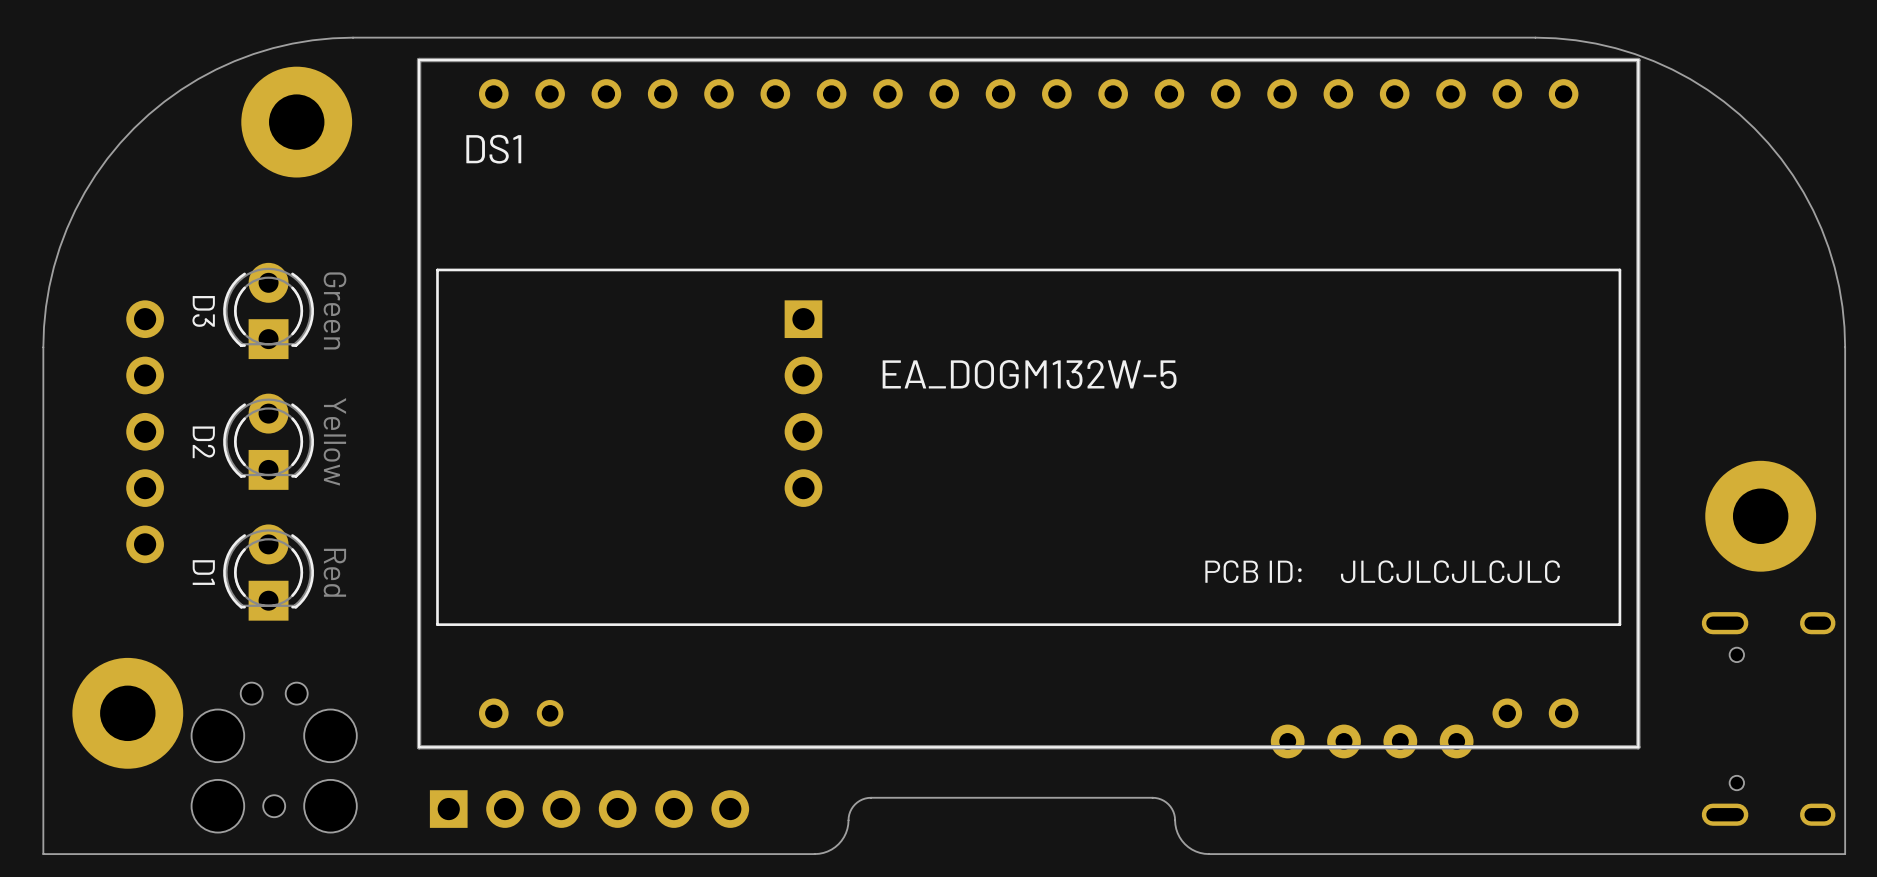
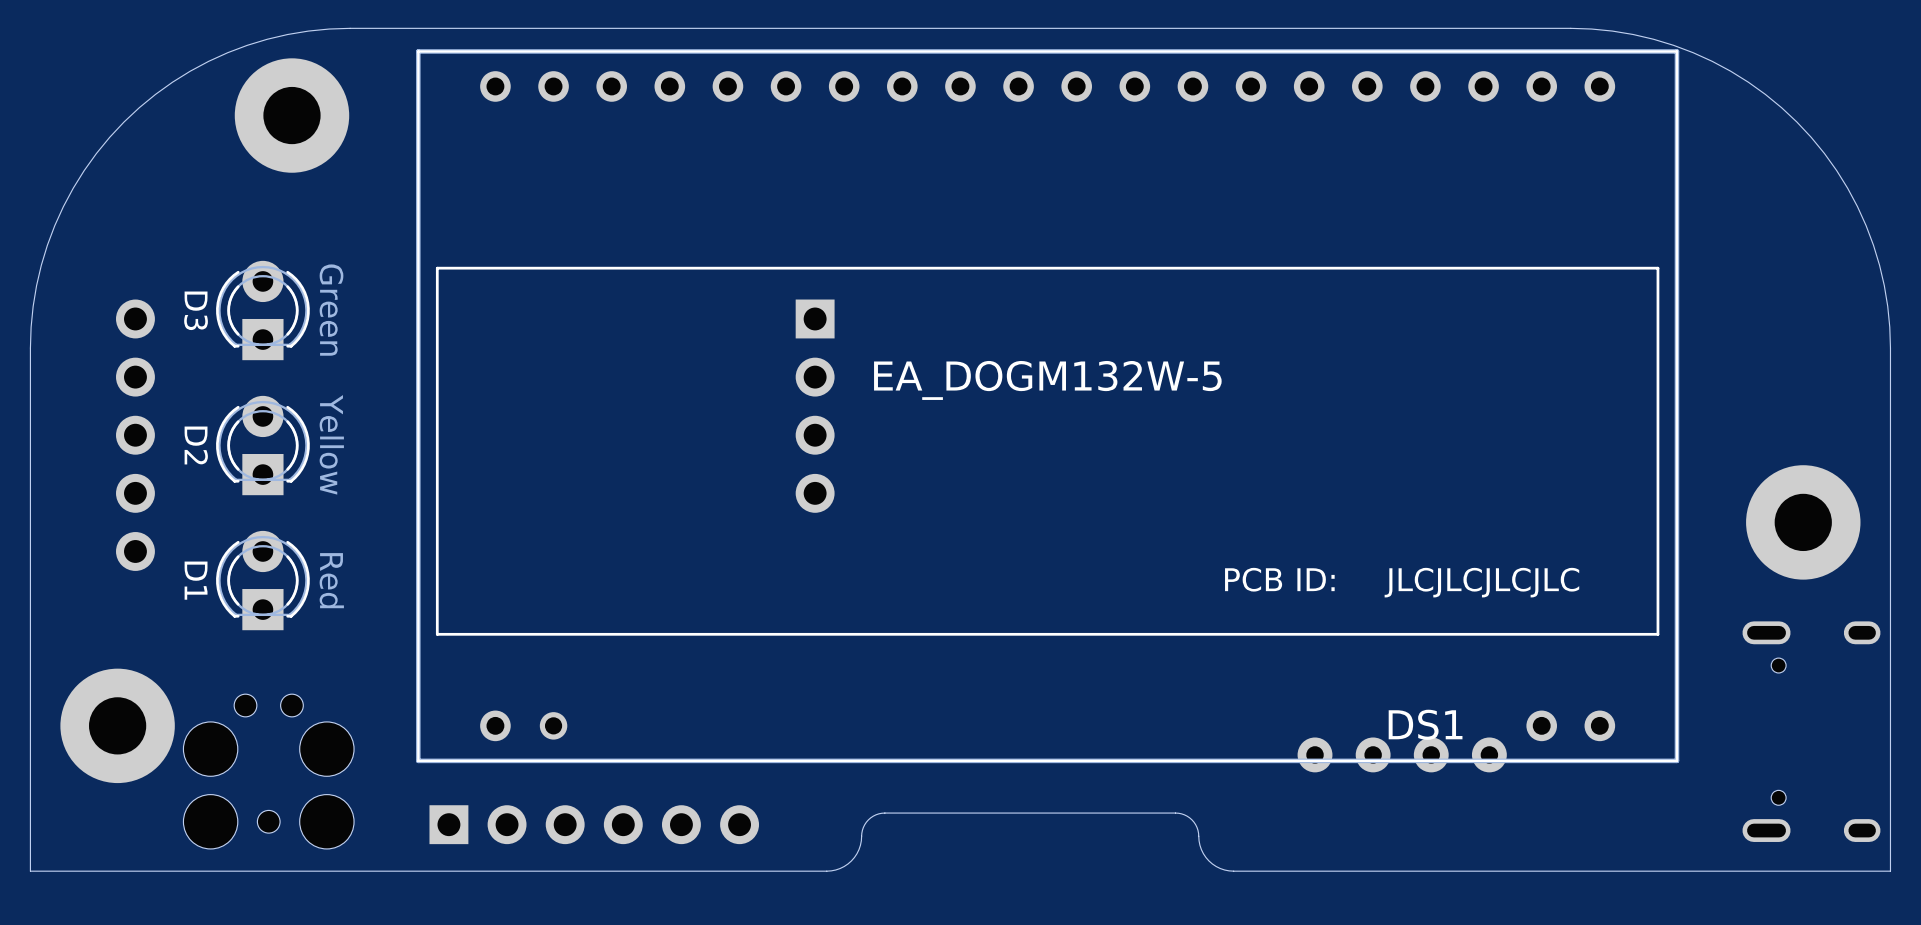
DS1 name position: DS1 (493, 149) -> DS1 (1425, 724)

